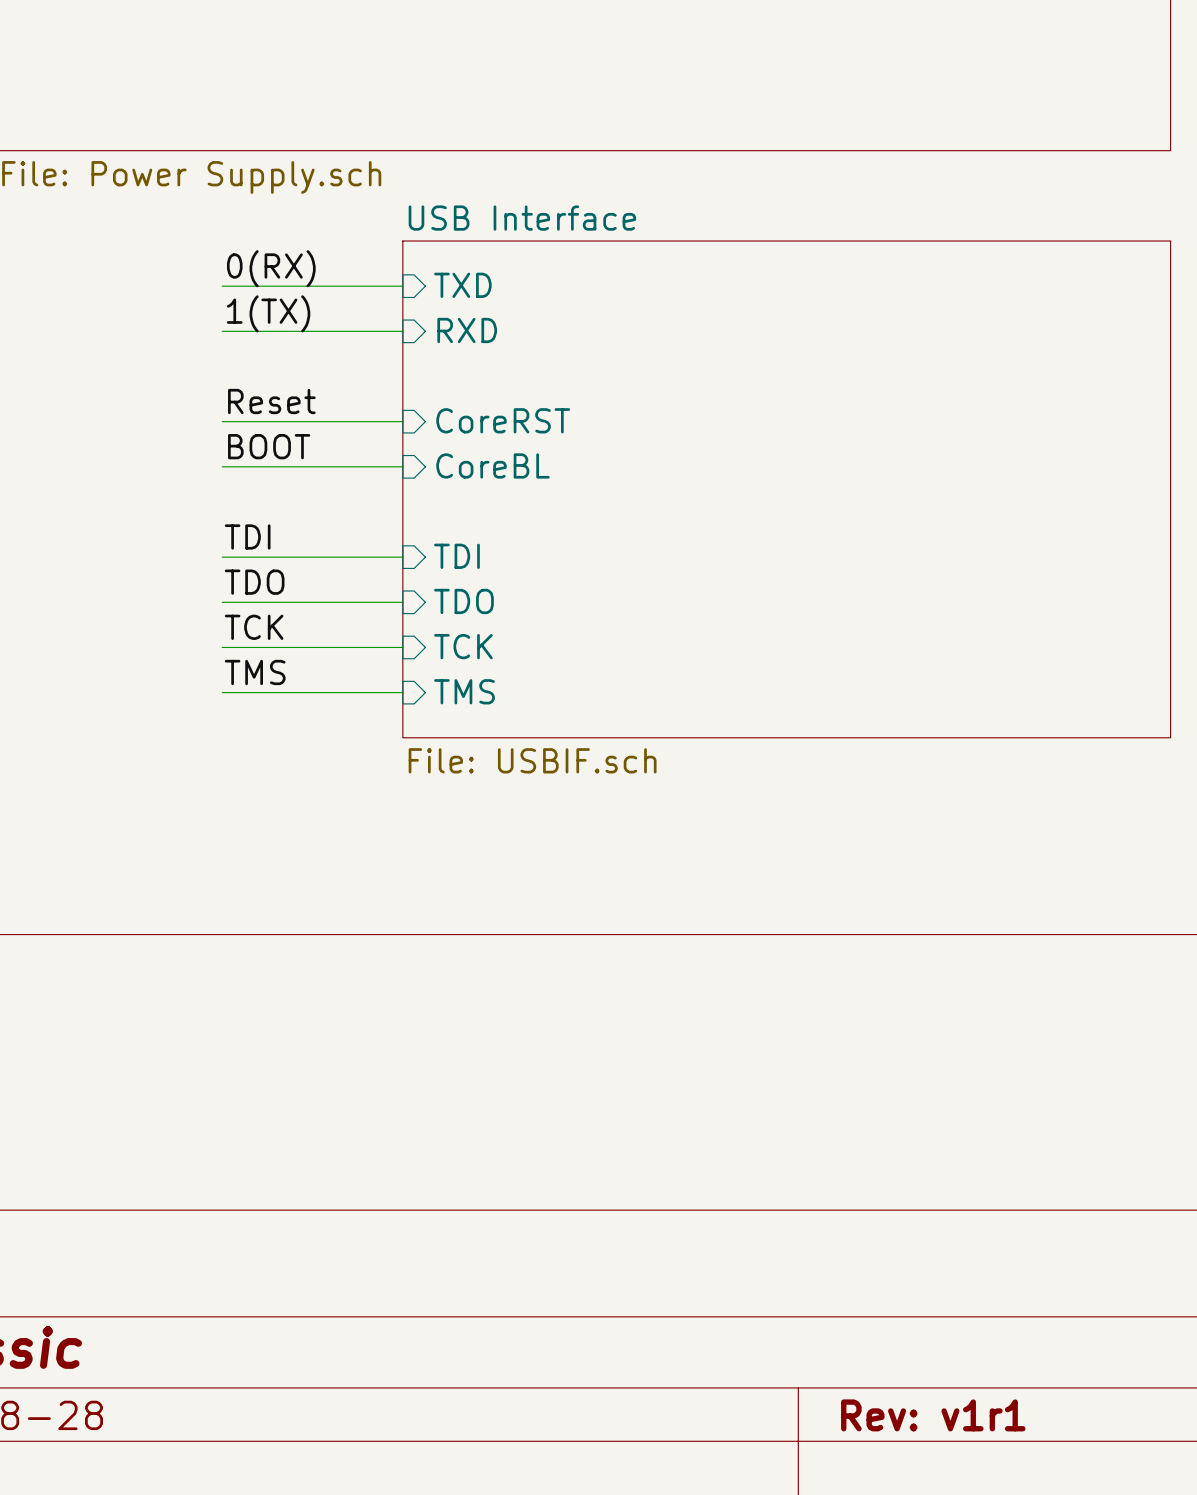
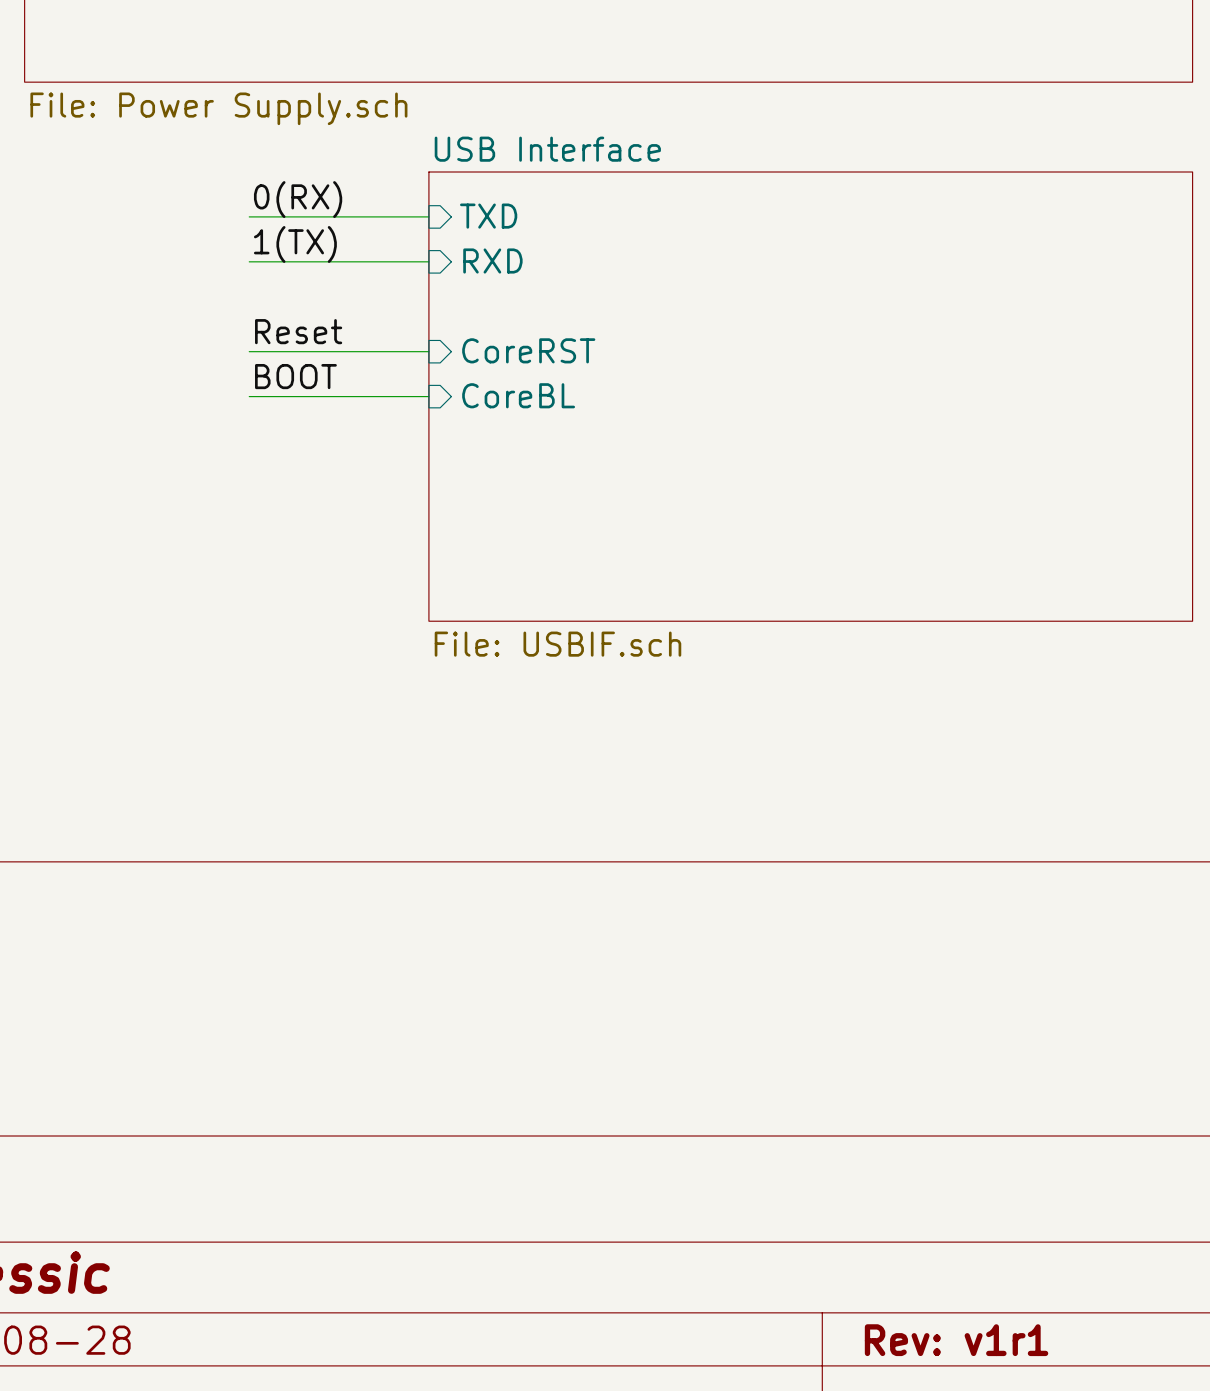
sheet USB Interface: none -> File: USBIF.sch (810, 396)
sheet USB Interface: File: USBIF.sch (786, 489) -> none
label: TDI (247, 536) -> none
sheet pin: TDI (456, 556) -> none
wire: (222, 557) (402, 557) -> none
label: TDO (254, 582) -> none
sheet pin: TDO (463, 601) -> none
wire: (222, 602) (402, 602) -> none
label: TCK (254, 627) -> none
sheet pin: TCK (463, 646) -> none
wire: (222, 647) (402, 647) -> none
label: TMS (255, 672) -> none
sheet pin: TMS (464, 691) -> none
wire: (222, 692) (402, 692) -> none

